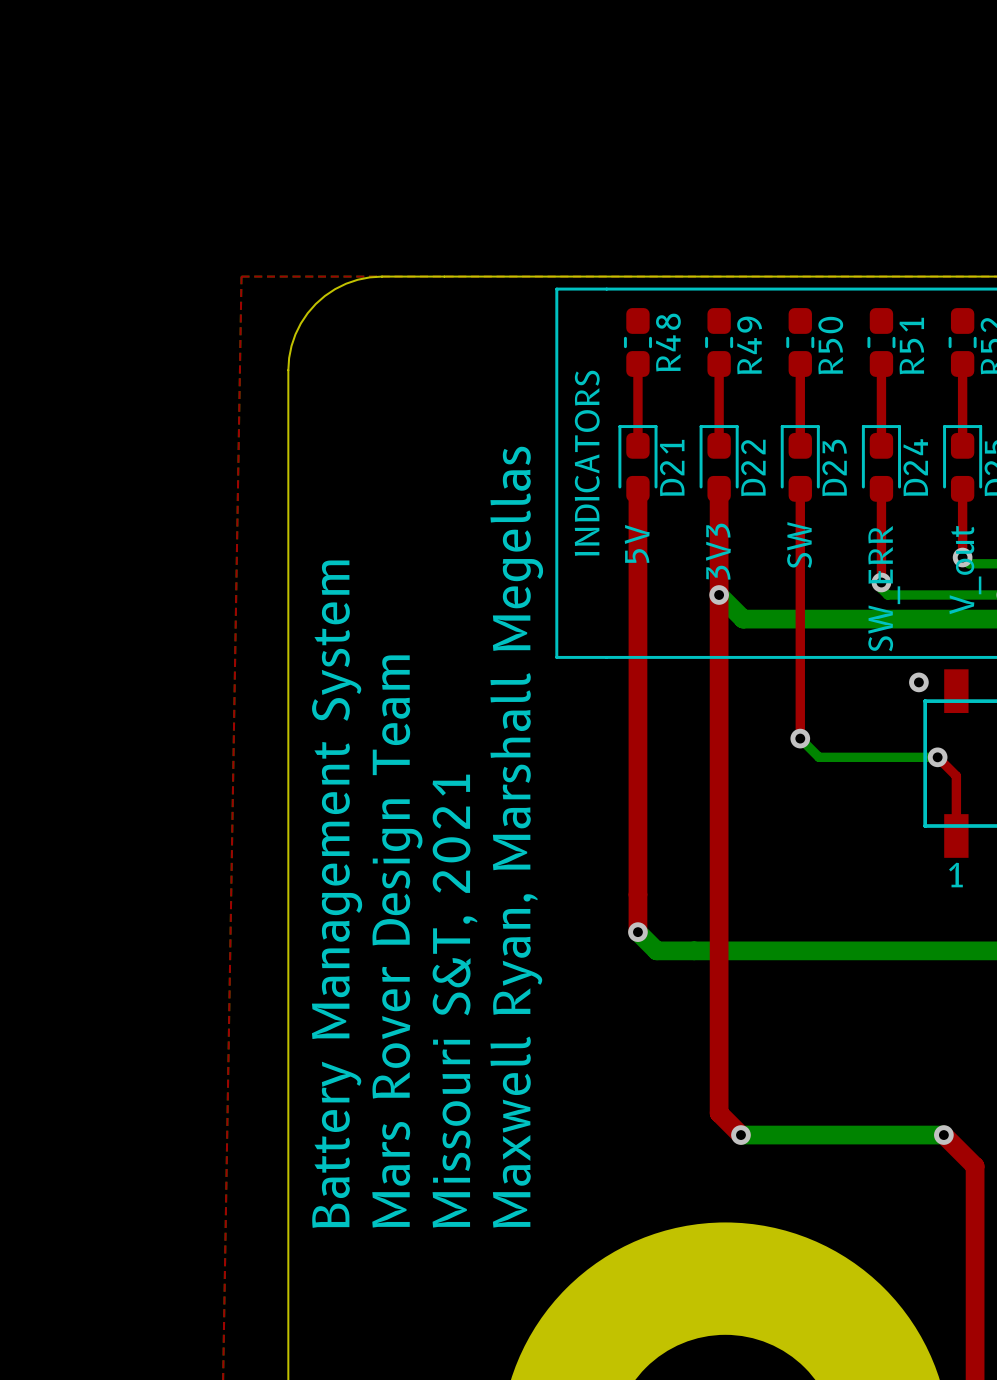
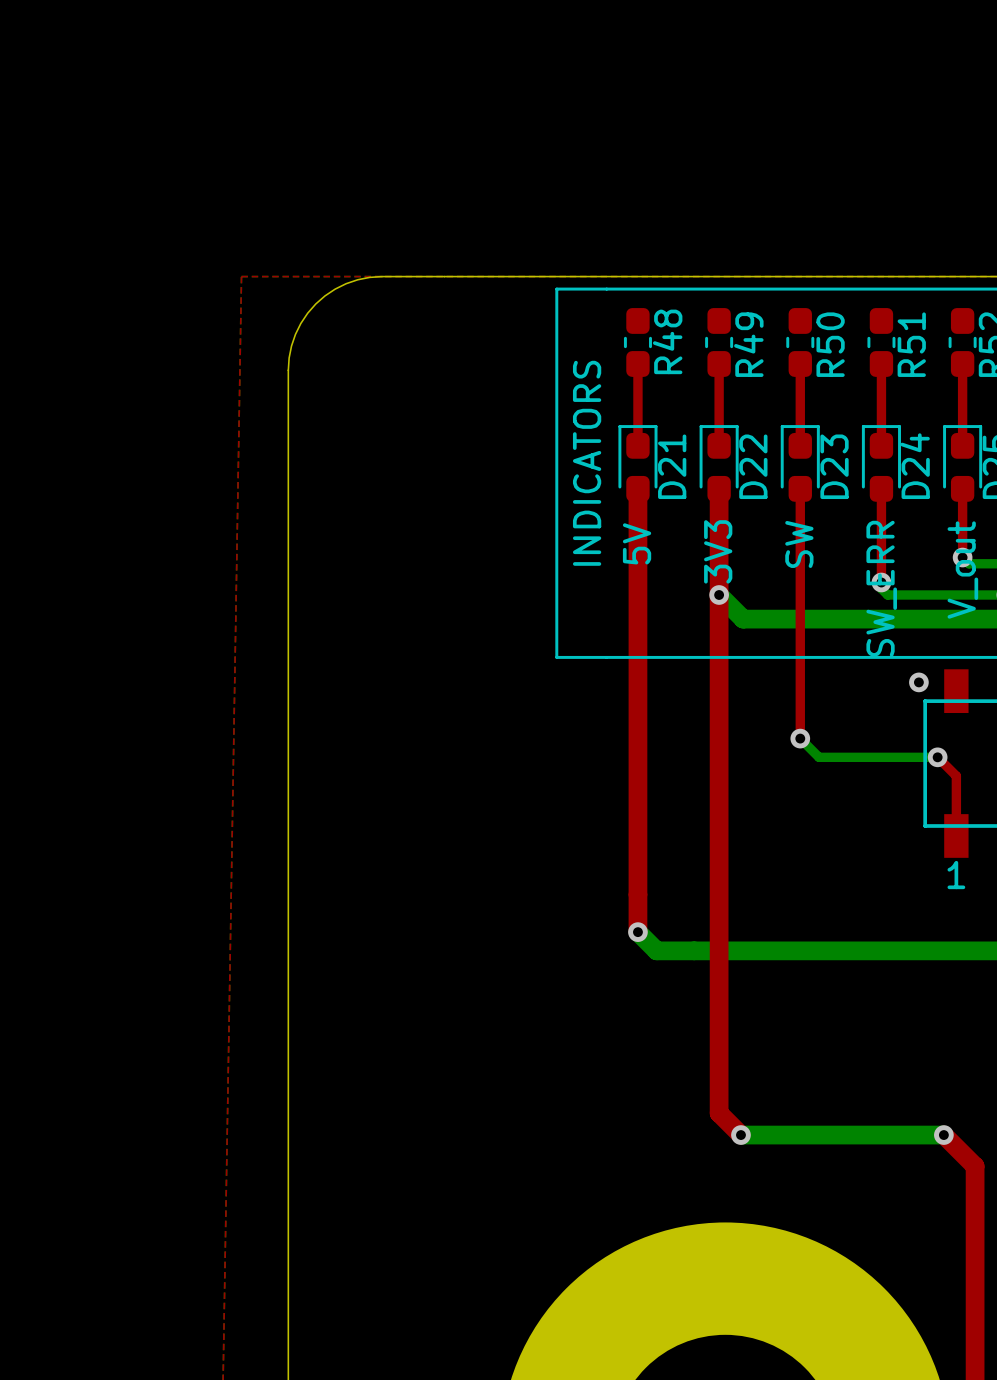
text: Maxwell Ryan, Marshall Megellas (516, 837) -> none
text: Battery Management System (337, 894) -> none
text: Mars Rover Design Team (397, 941) -> none
text: Missouri S&T, 2021 (455, 1001) -> none

